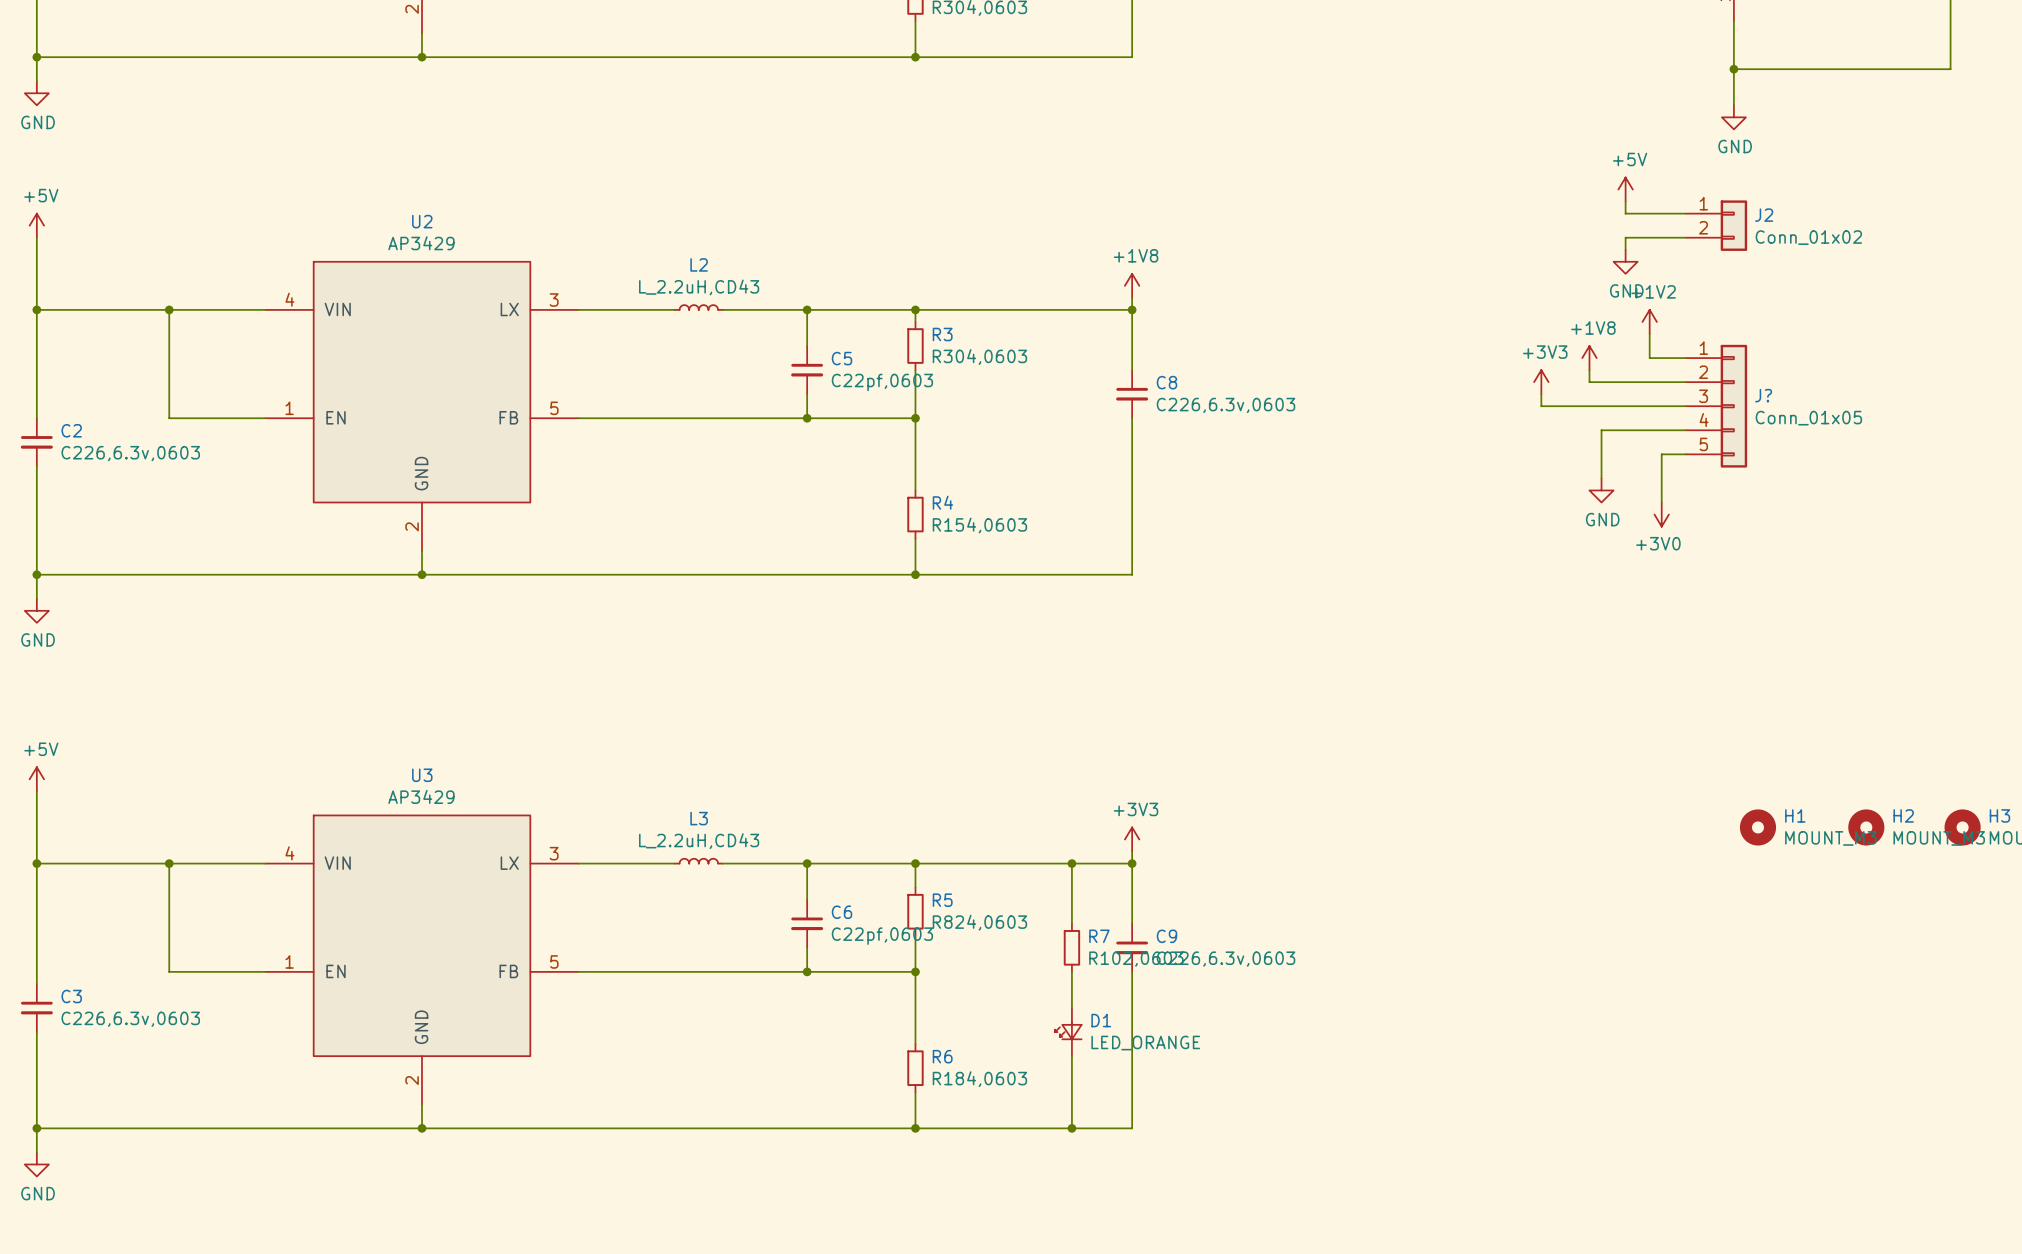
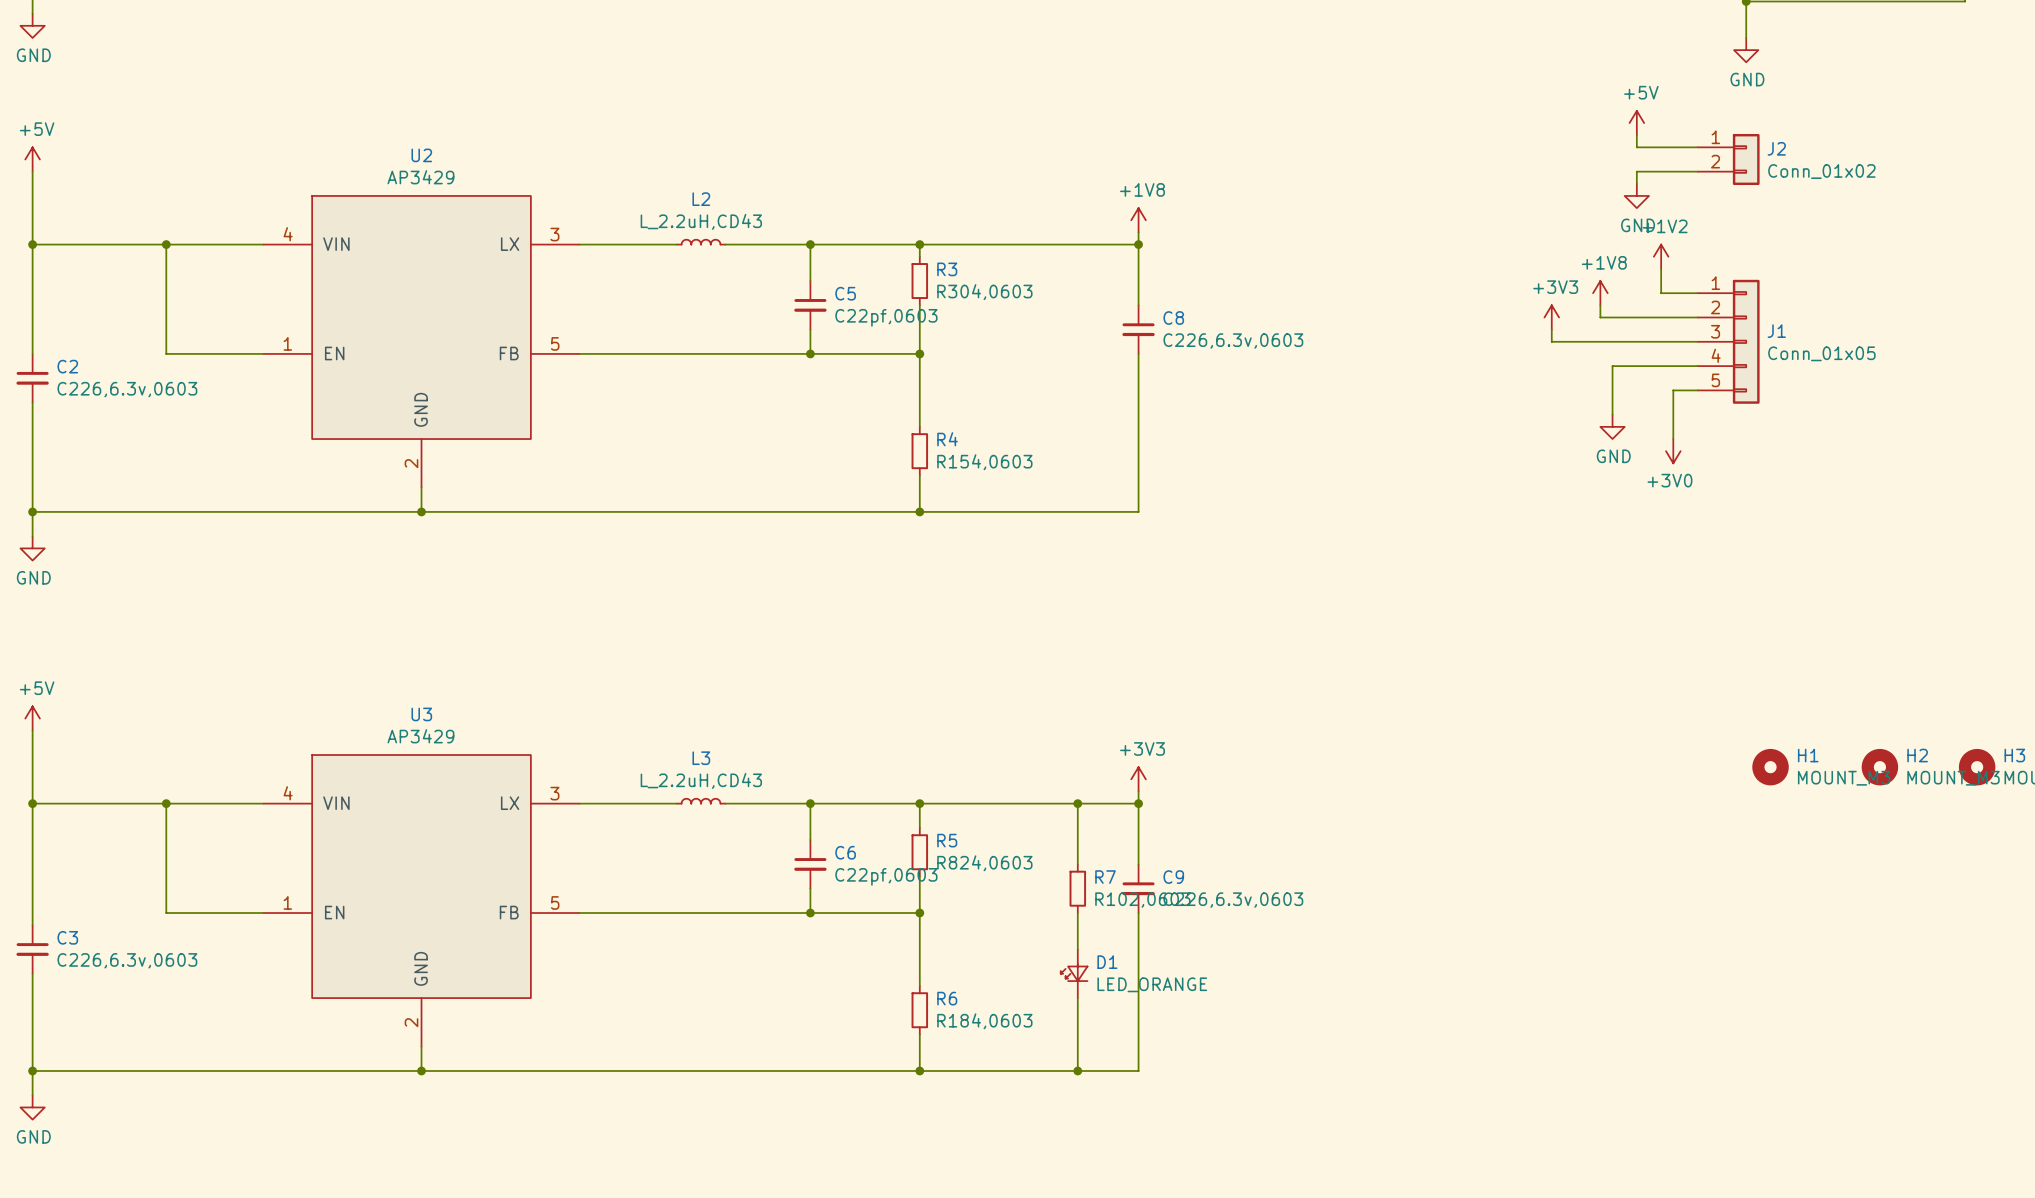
J? name: J? (1763, 395) -> J1 (1776, 331)

